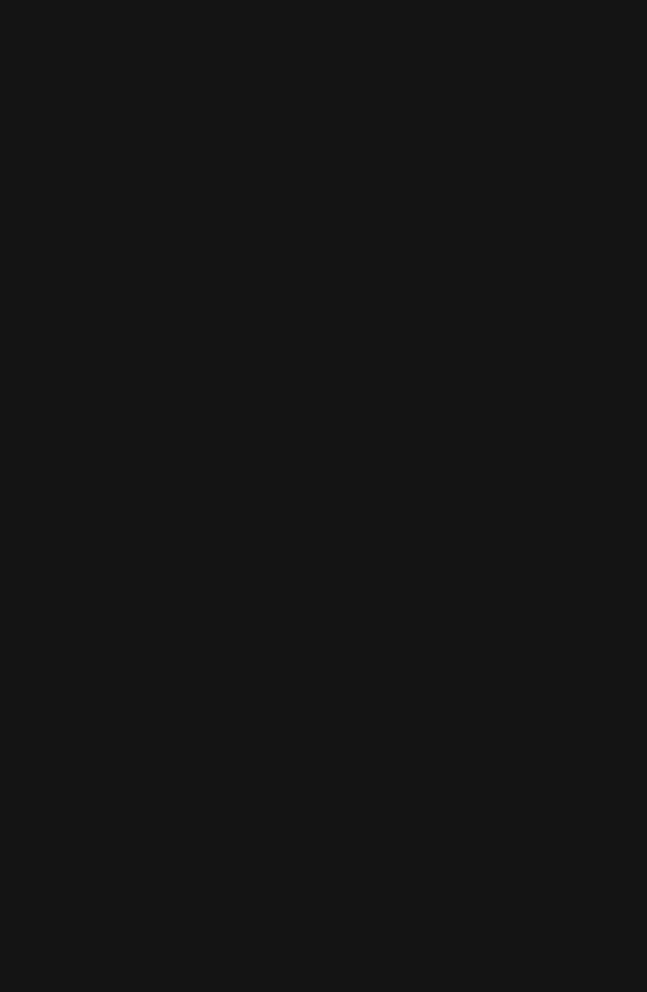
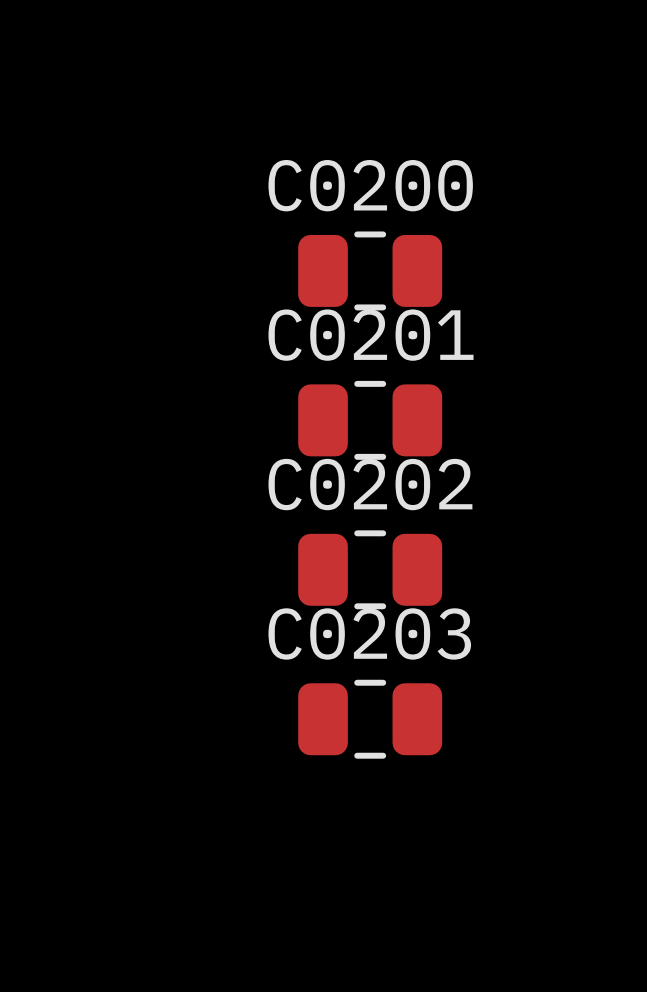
C0200: none -> (370, 270)
C0201: none -> (370, 420)
C0202: none -> (370, 569)
C0203: none -> (370, 719)

